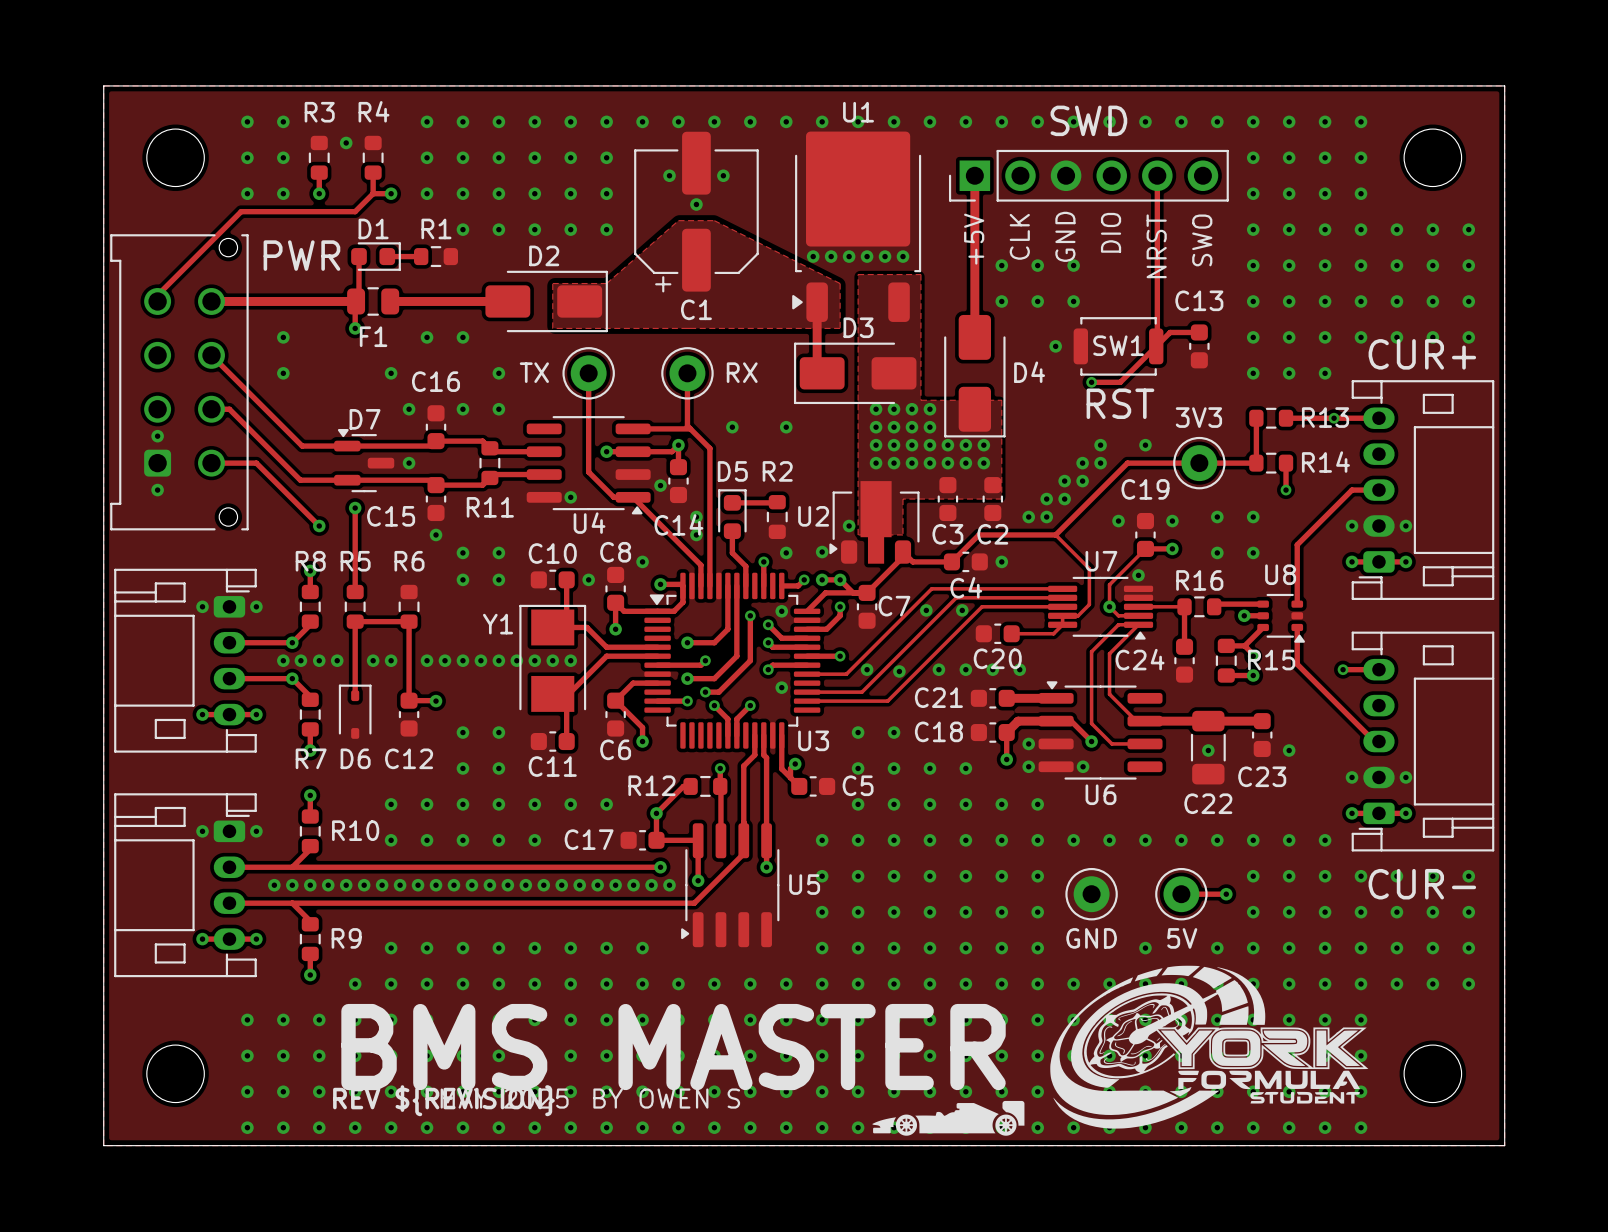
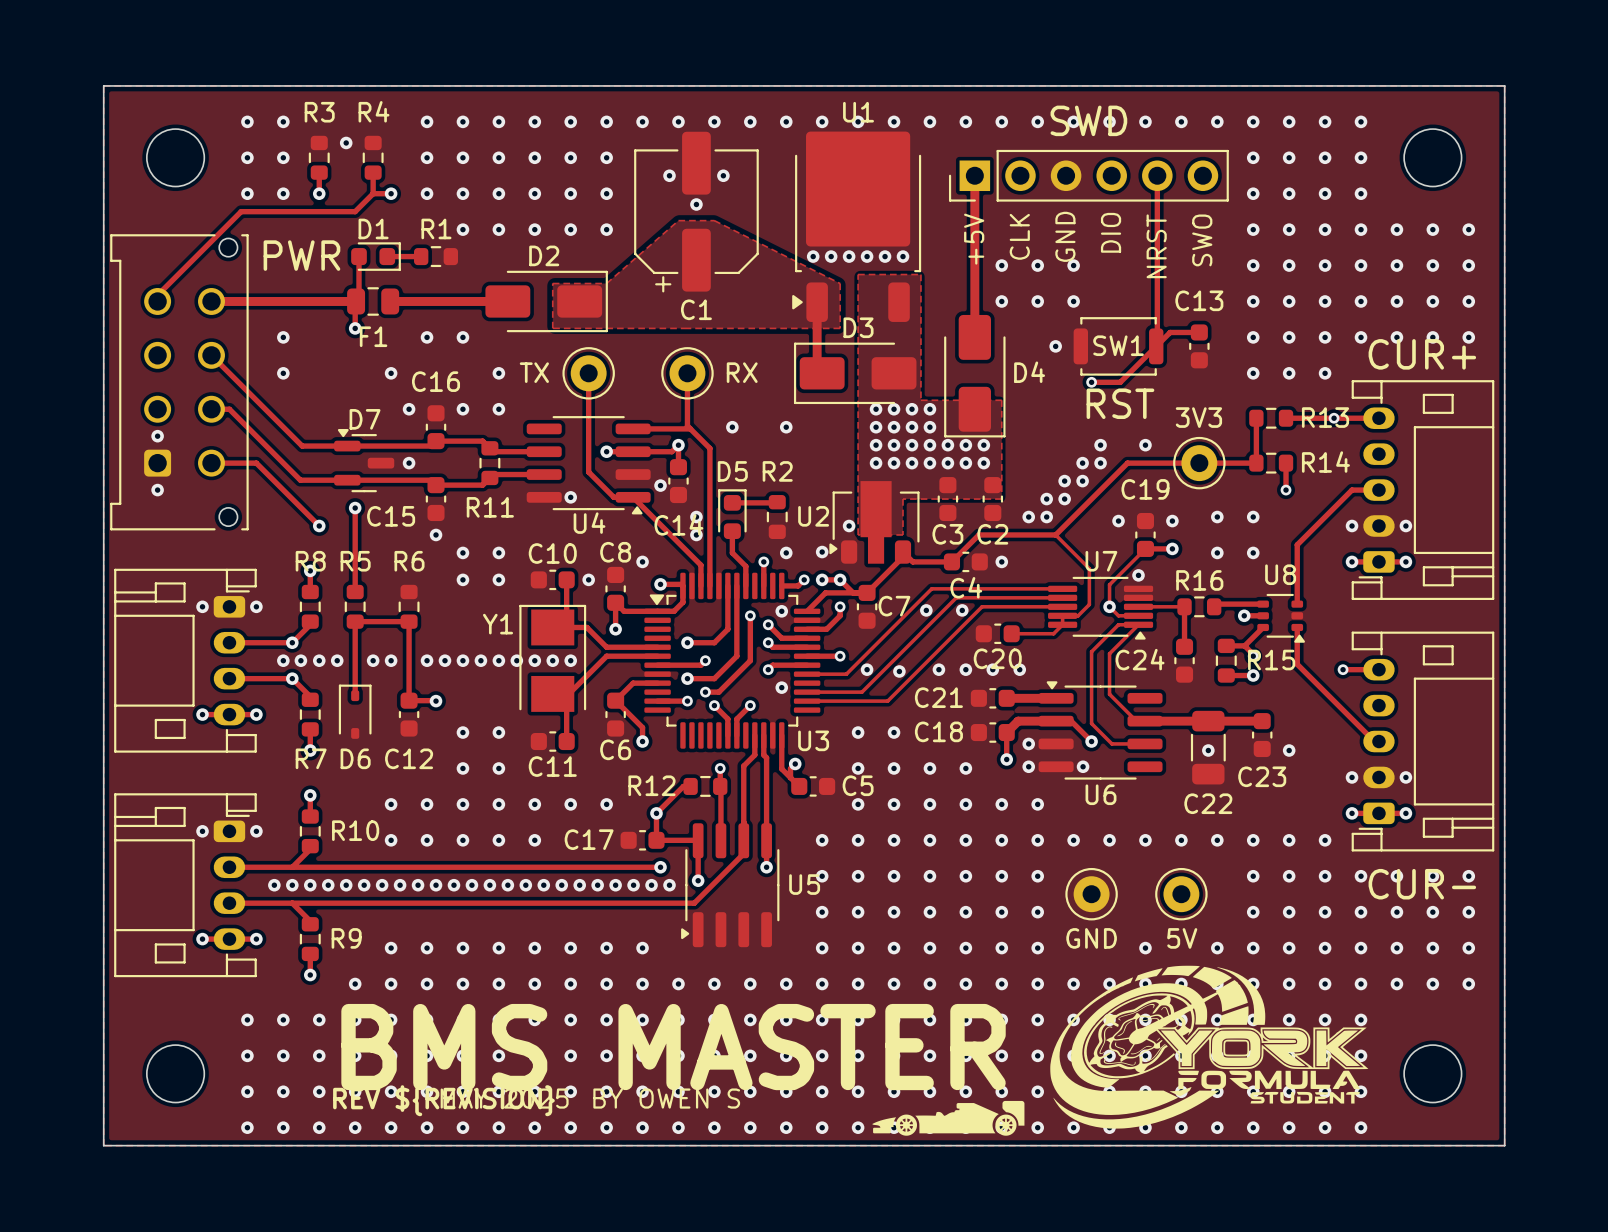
track: (1181, 894) (1226, 894) -> none
via: (1226, 894) -> none

